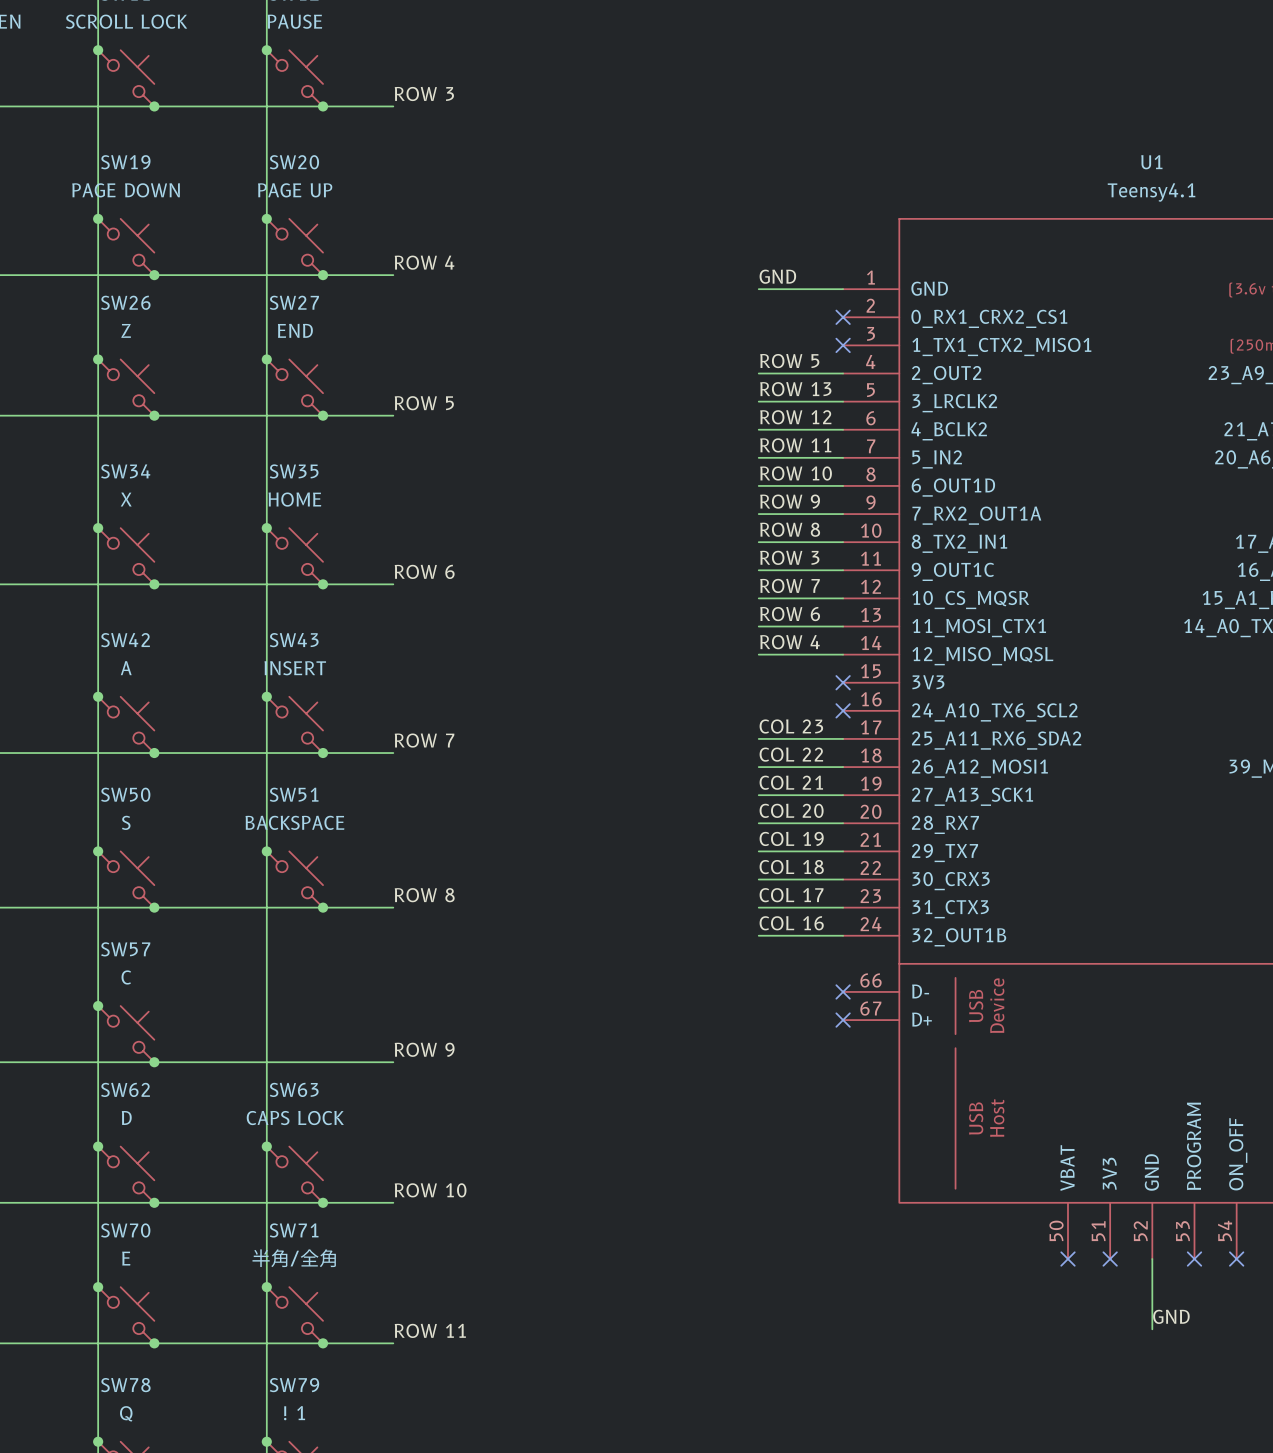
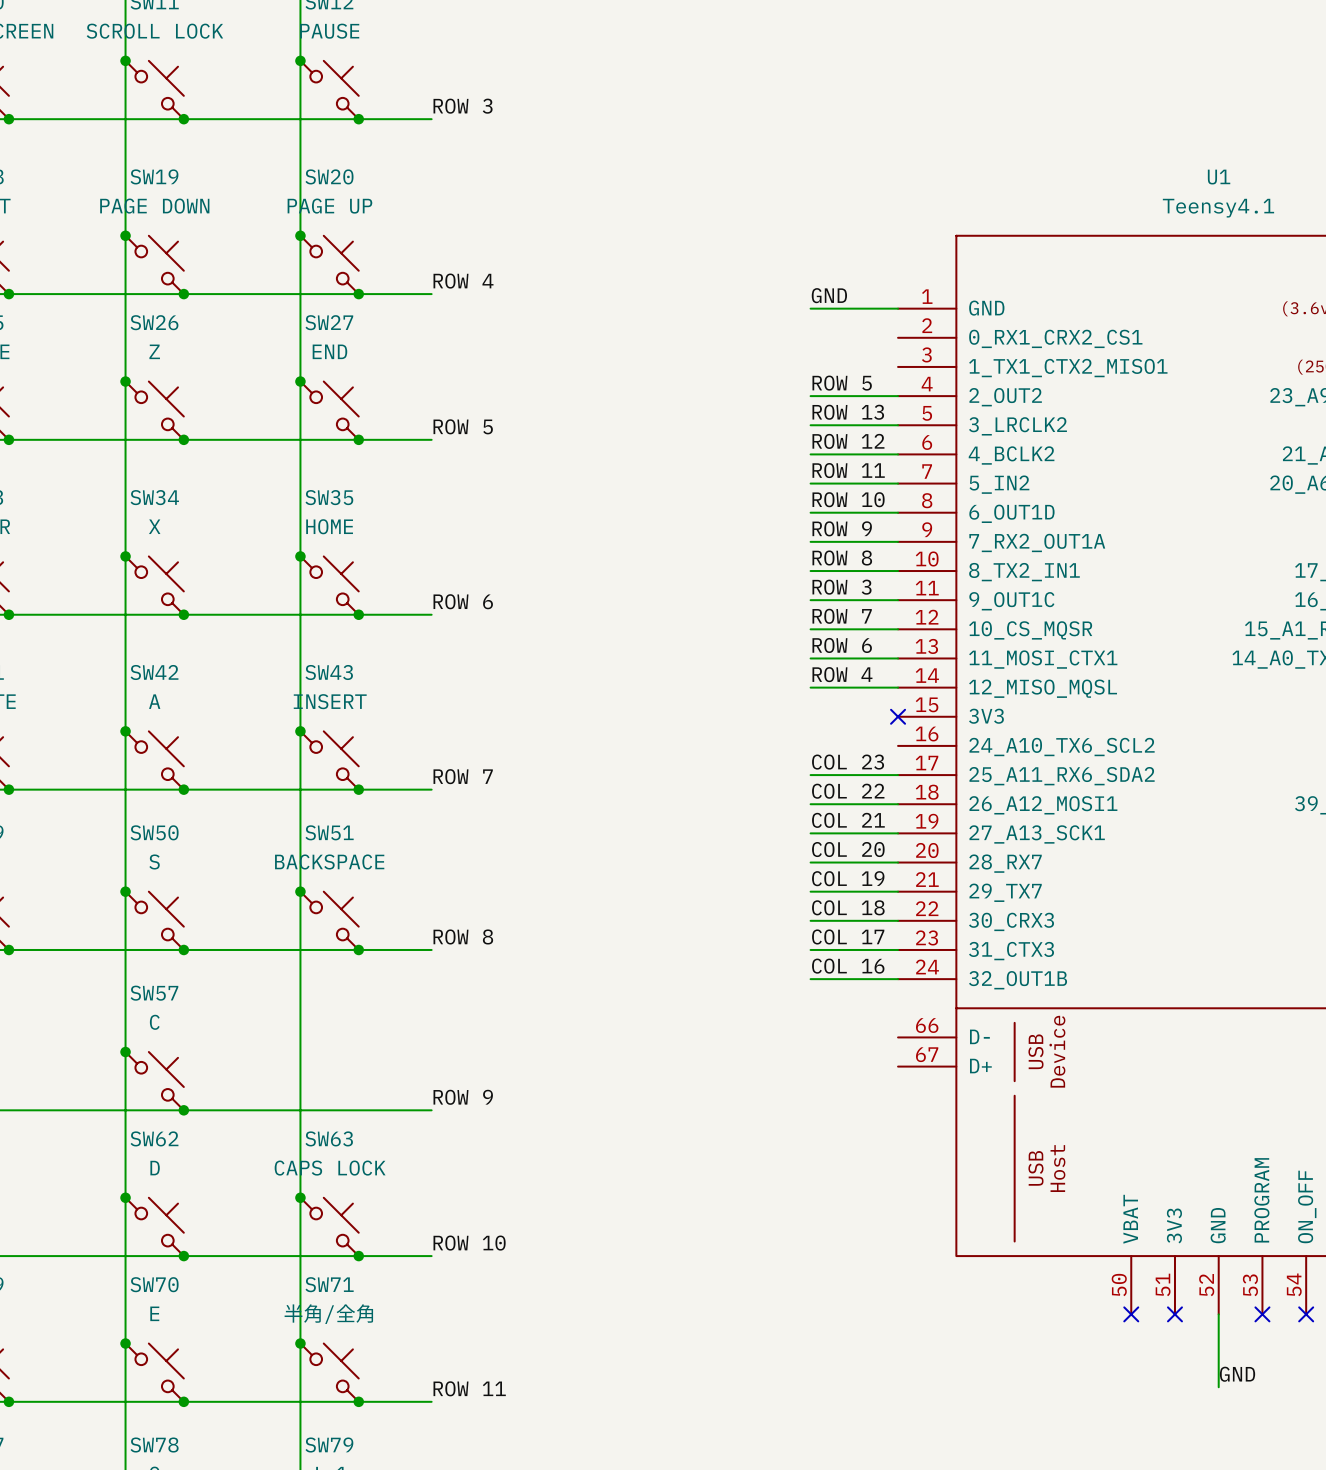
no-connect mark: (843, 317) -> none
no-connect mark: (843, 345) -> none
no-connect mark: (843, 710) -> none
no-connect mark: (843, 991) -> none
no-connect mark: (843, 1020) -> none

